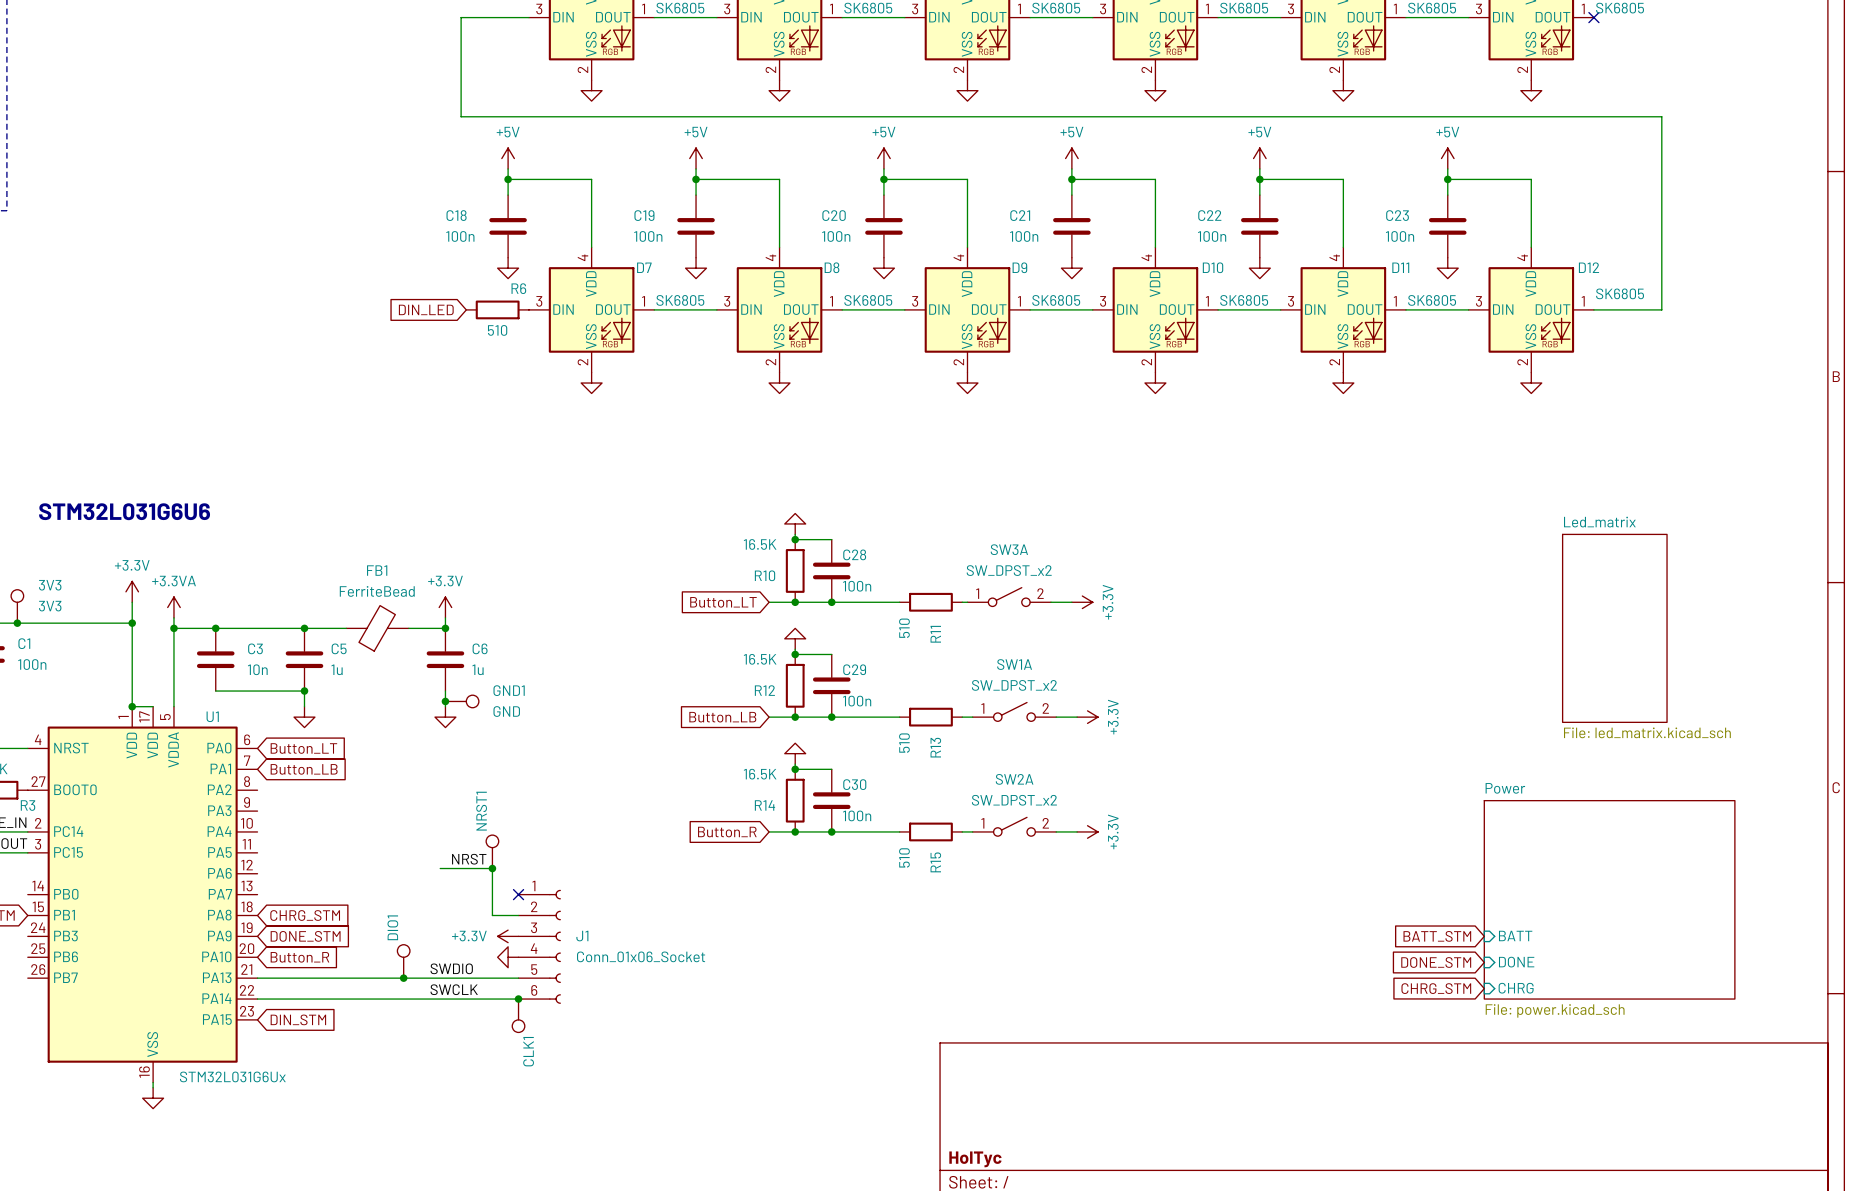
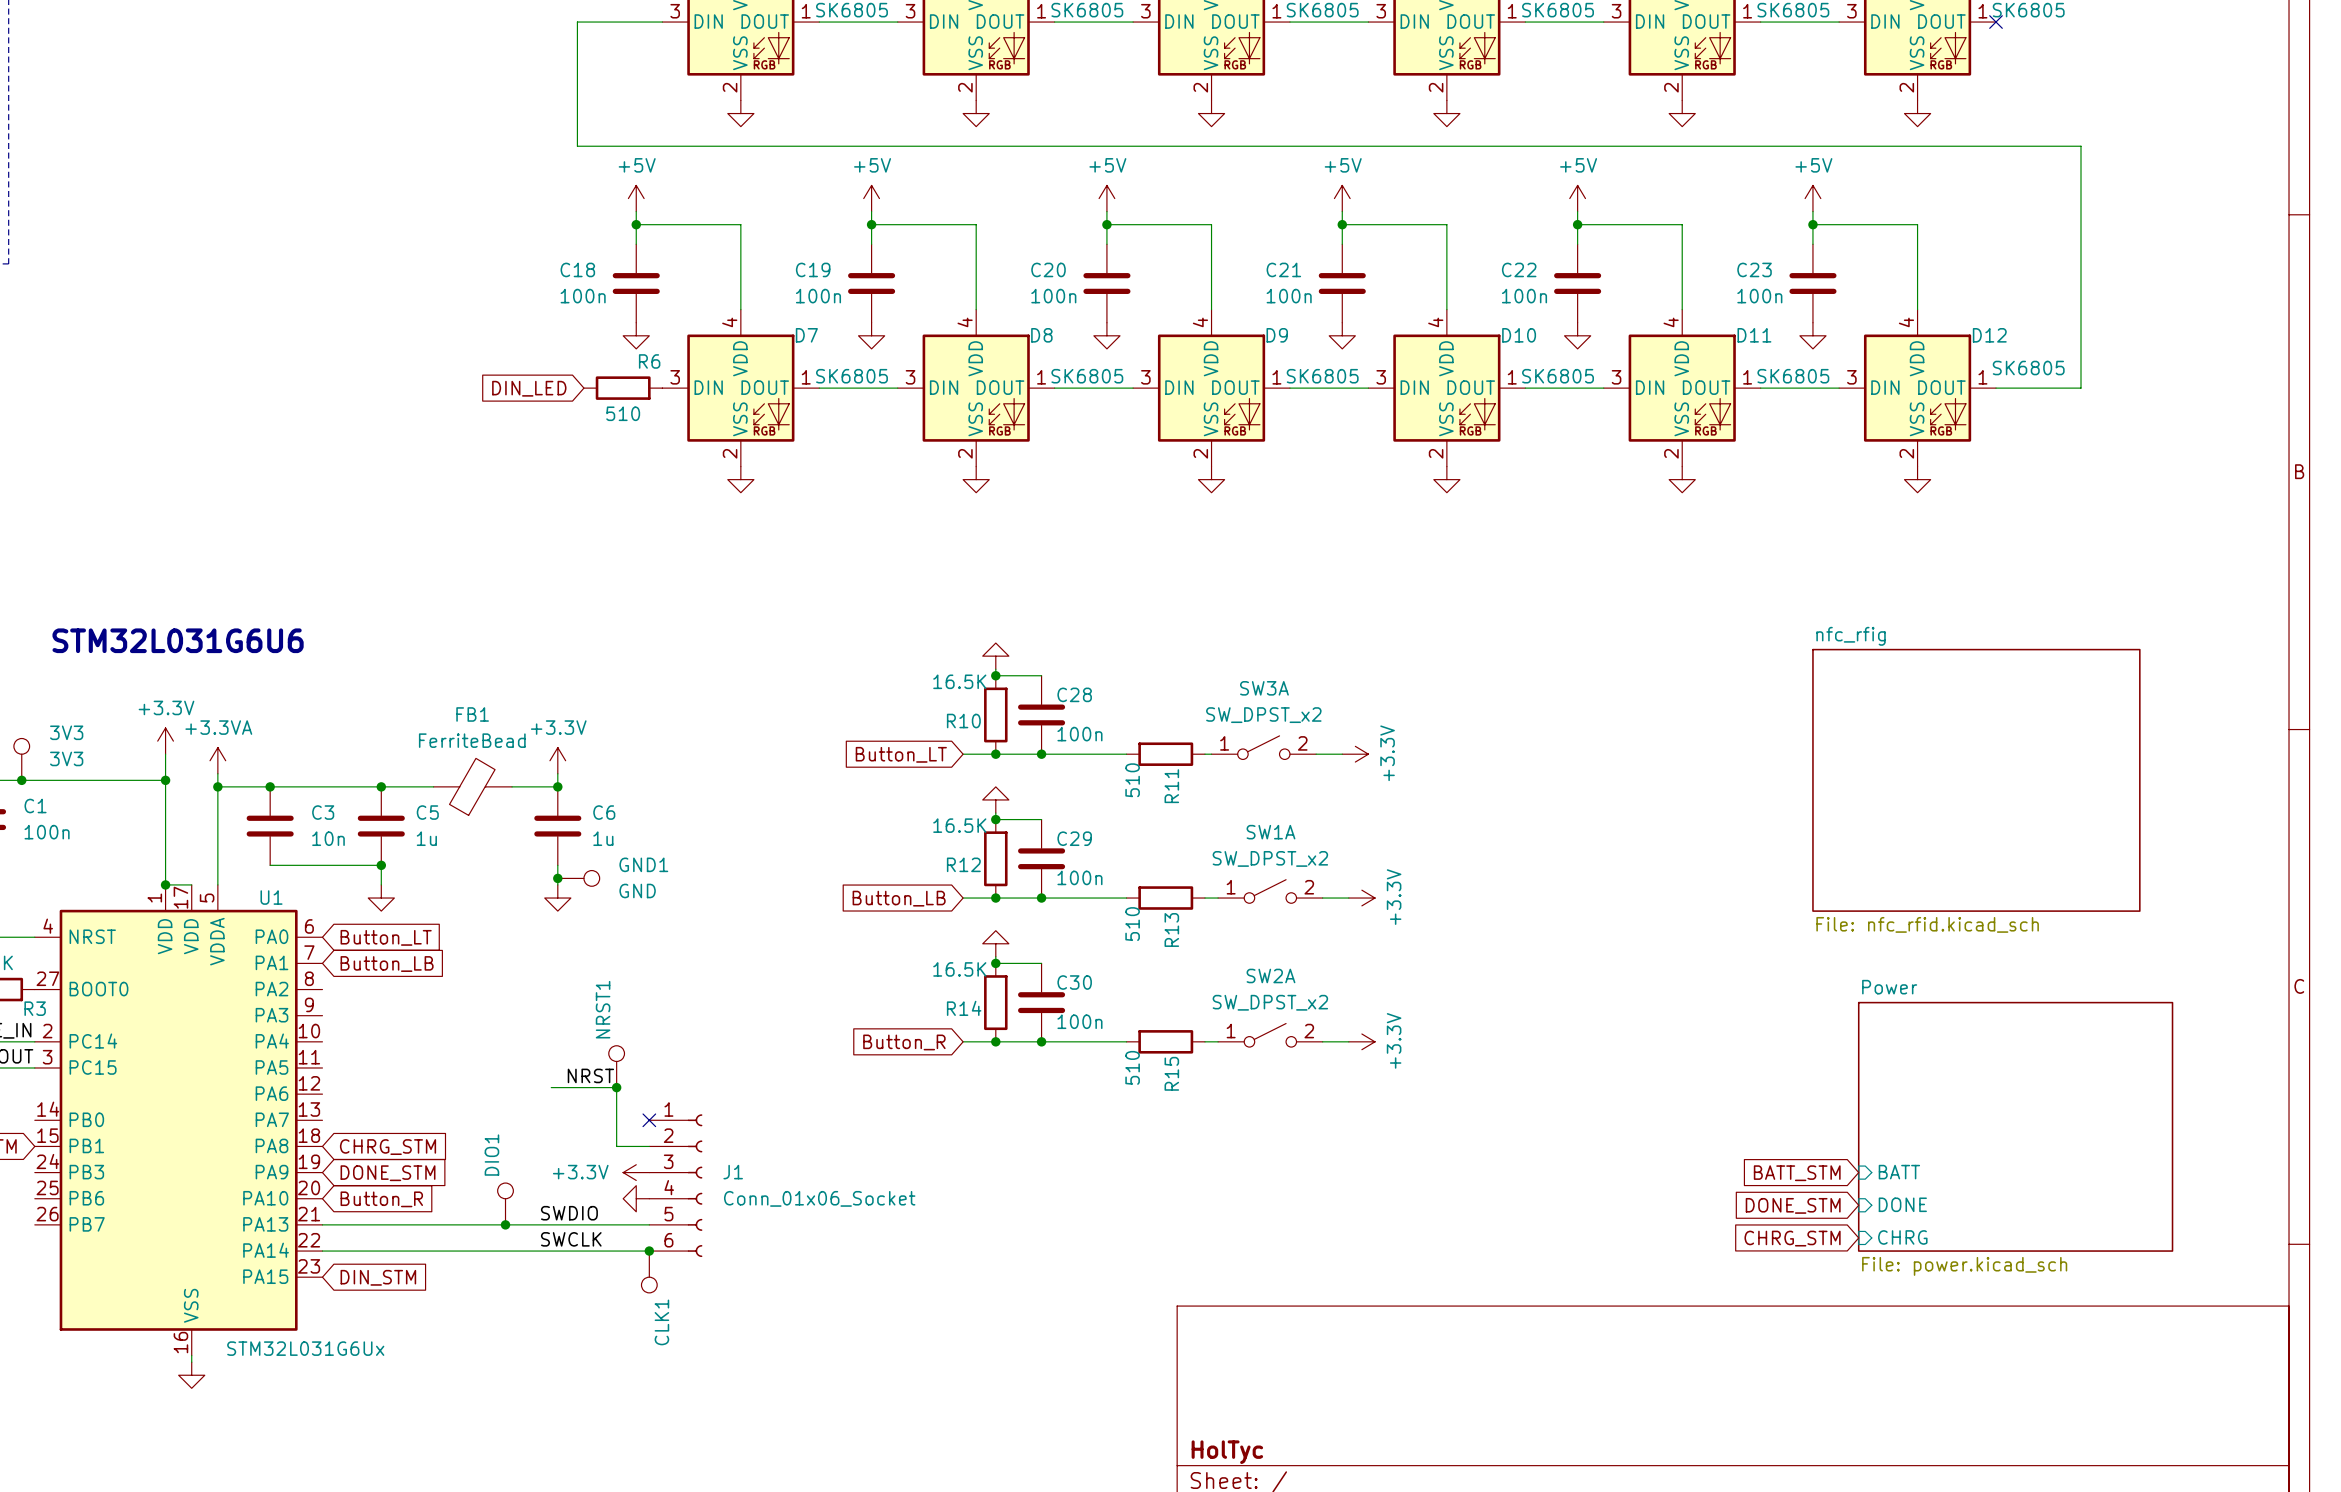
sheet nfc_rfig: none -> File: nfc_rfid.kicad_sch (1976, 780)
sheet Led_matrix: File: led_matrix.kicad_sch (1614, 628) -> none

